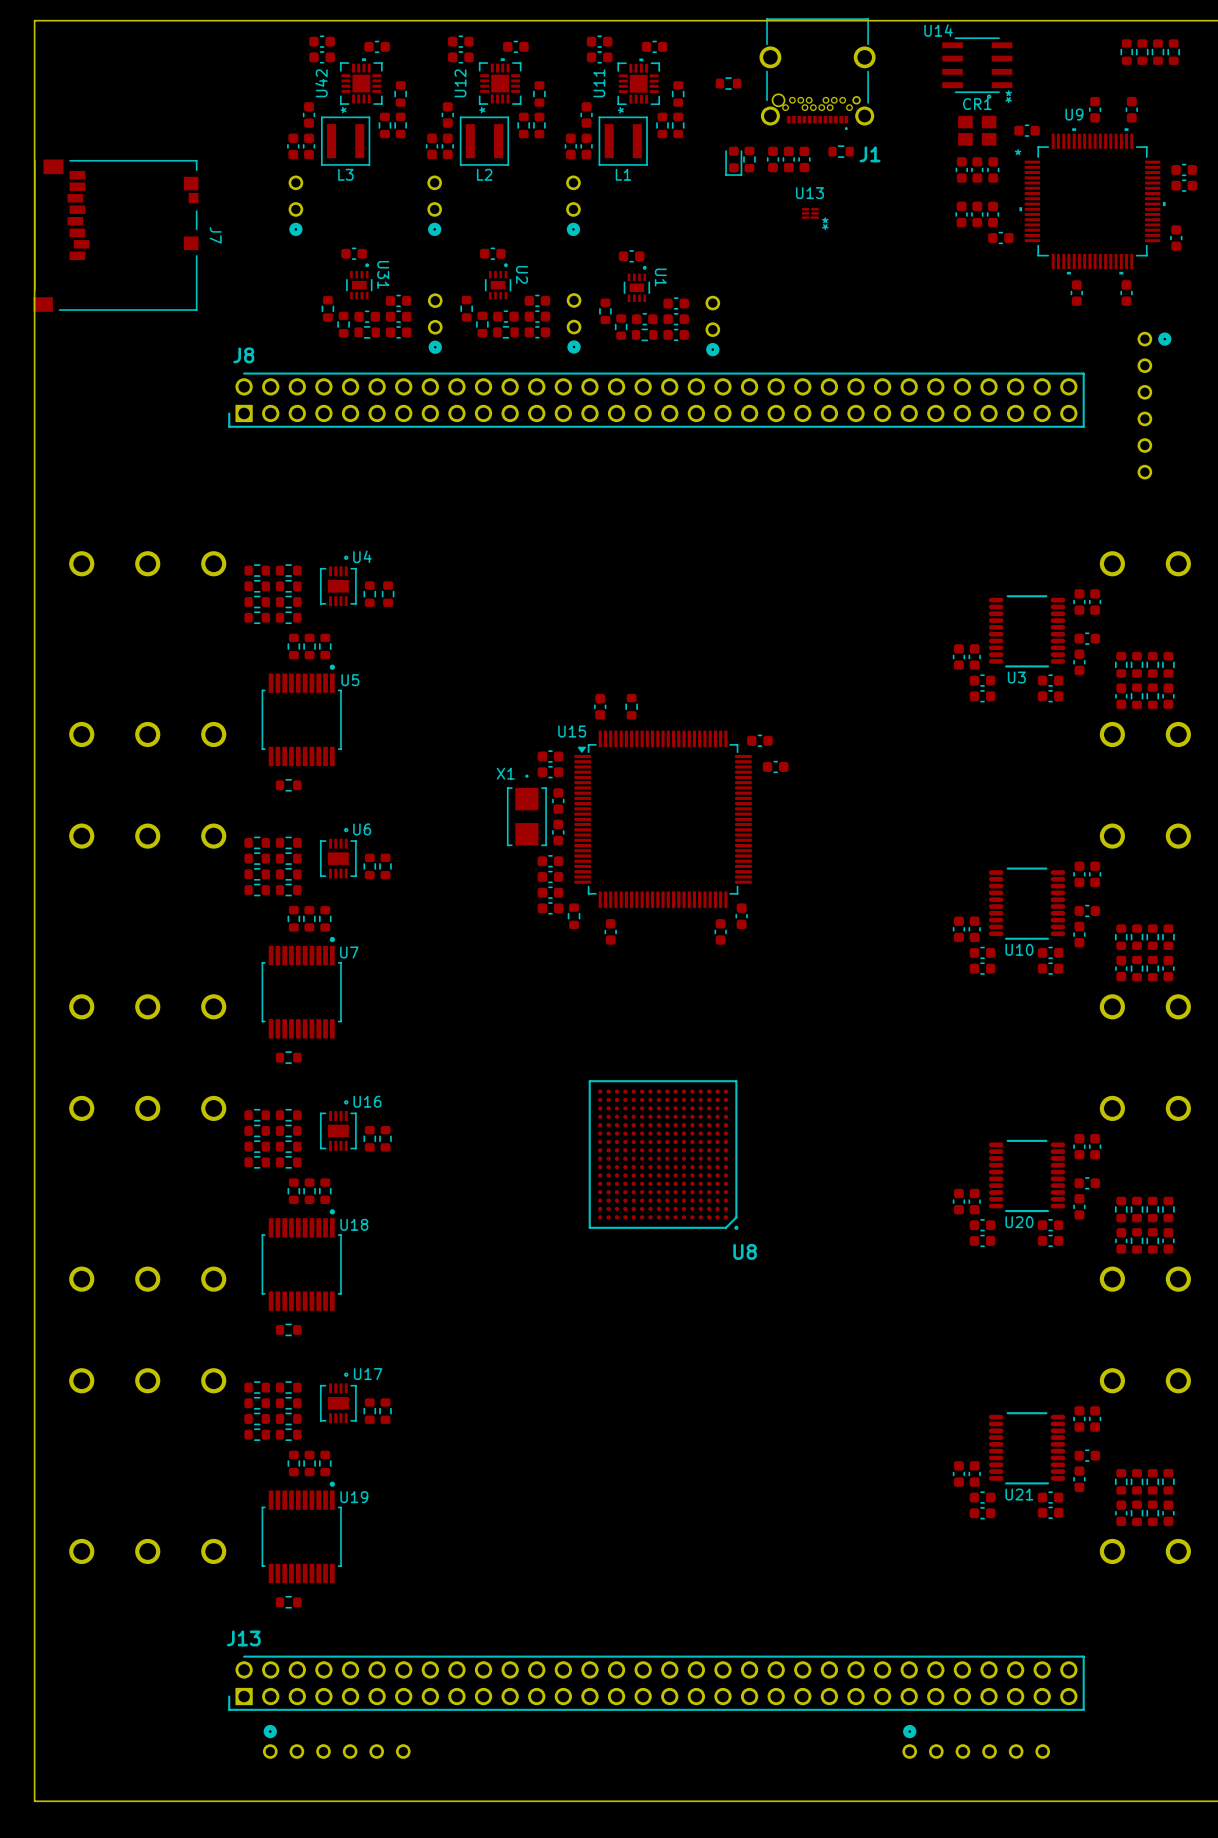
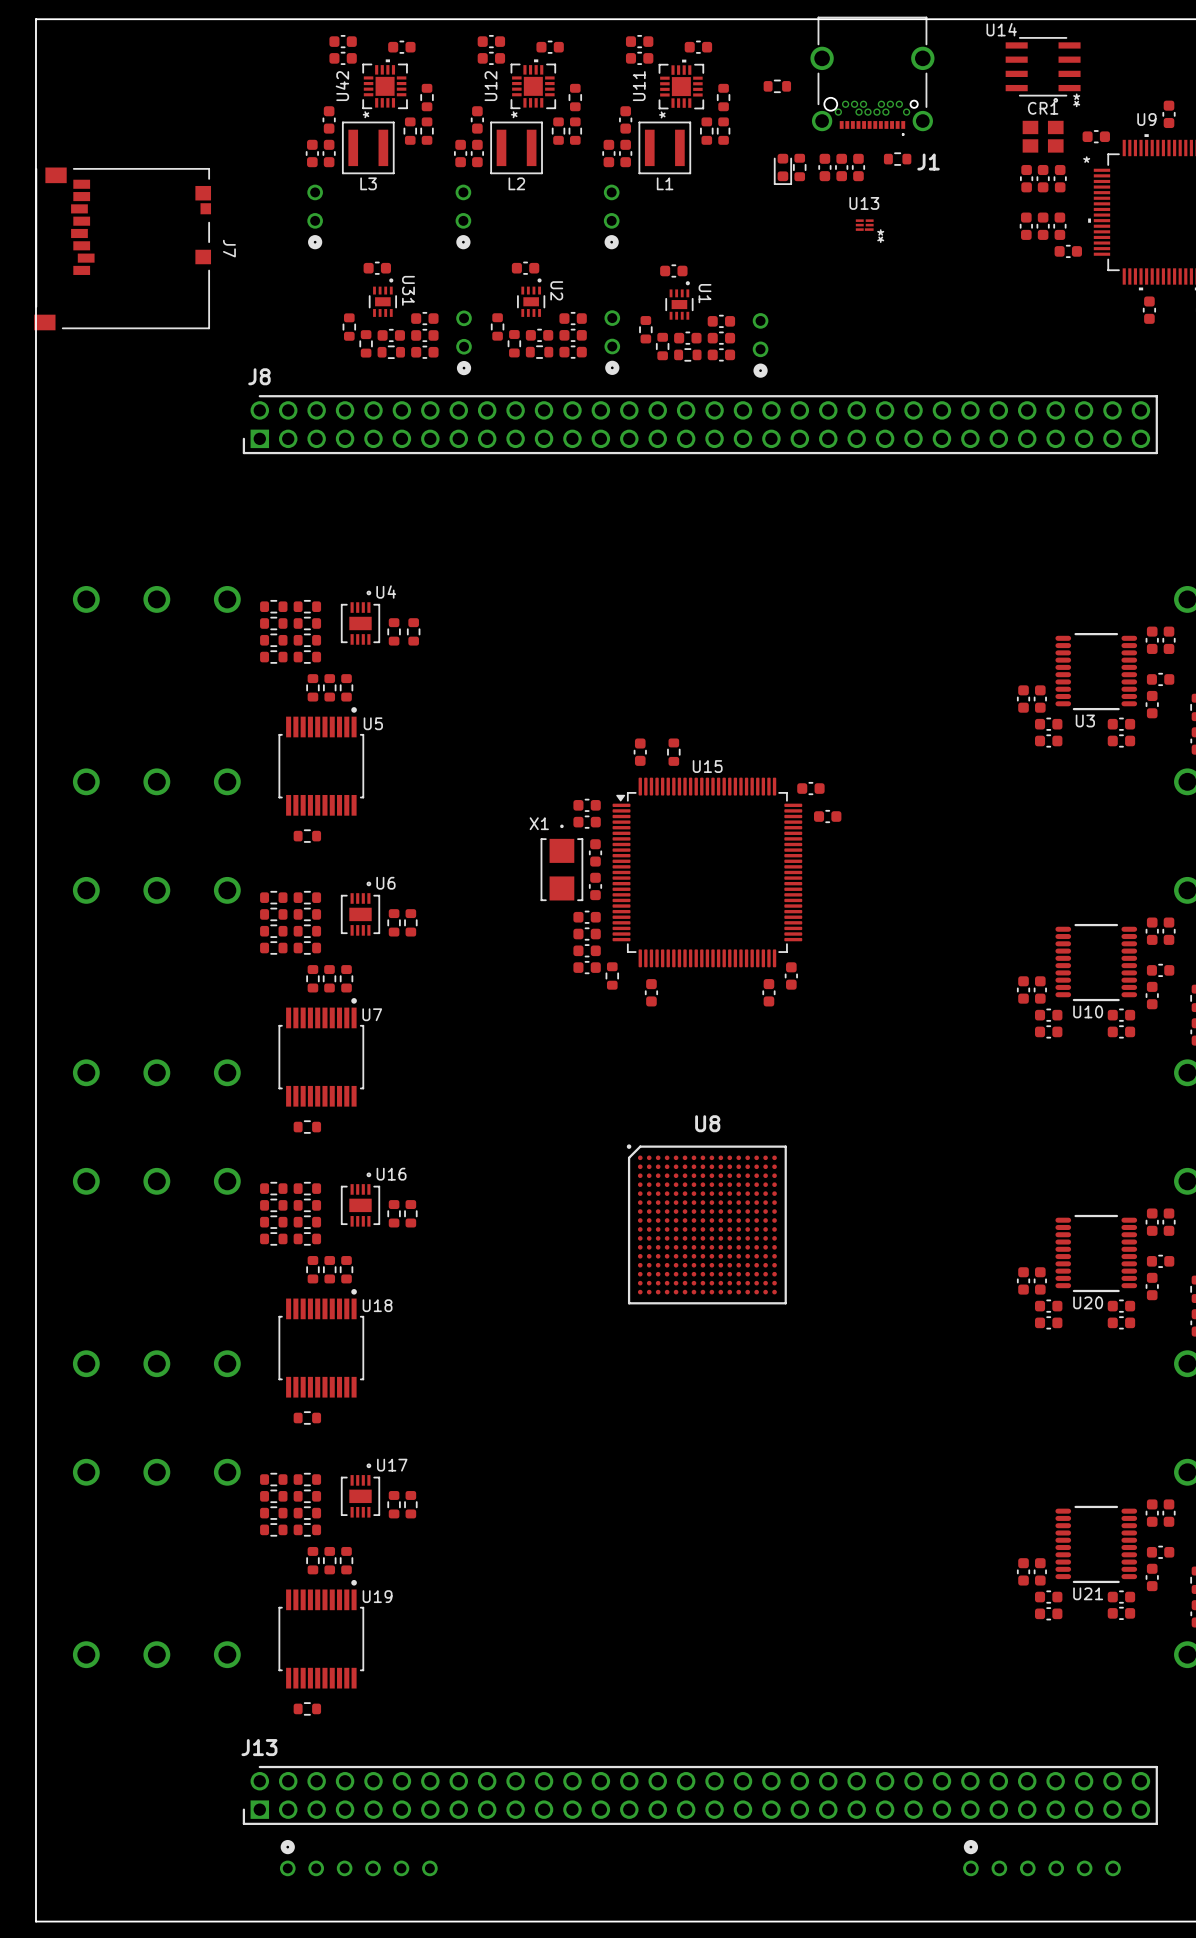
U15 name position: U15 (572, 731) -> U15 (707, 766)
U8 rotation: 0° (663, 1155) -> 180° (706, 1224)
U8 name position: U8 (745, 1251) -> U8 (707, 1123)

